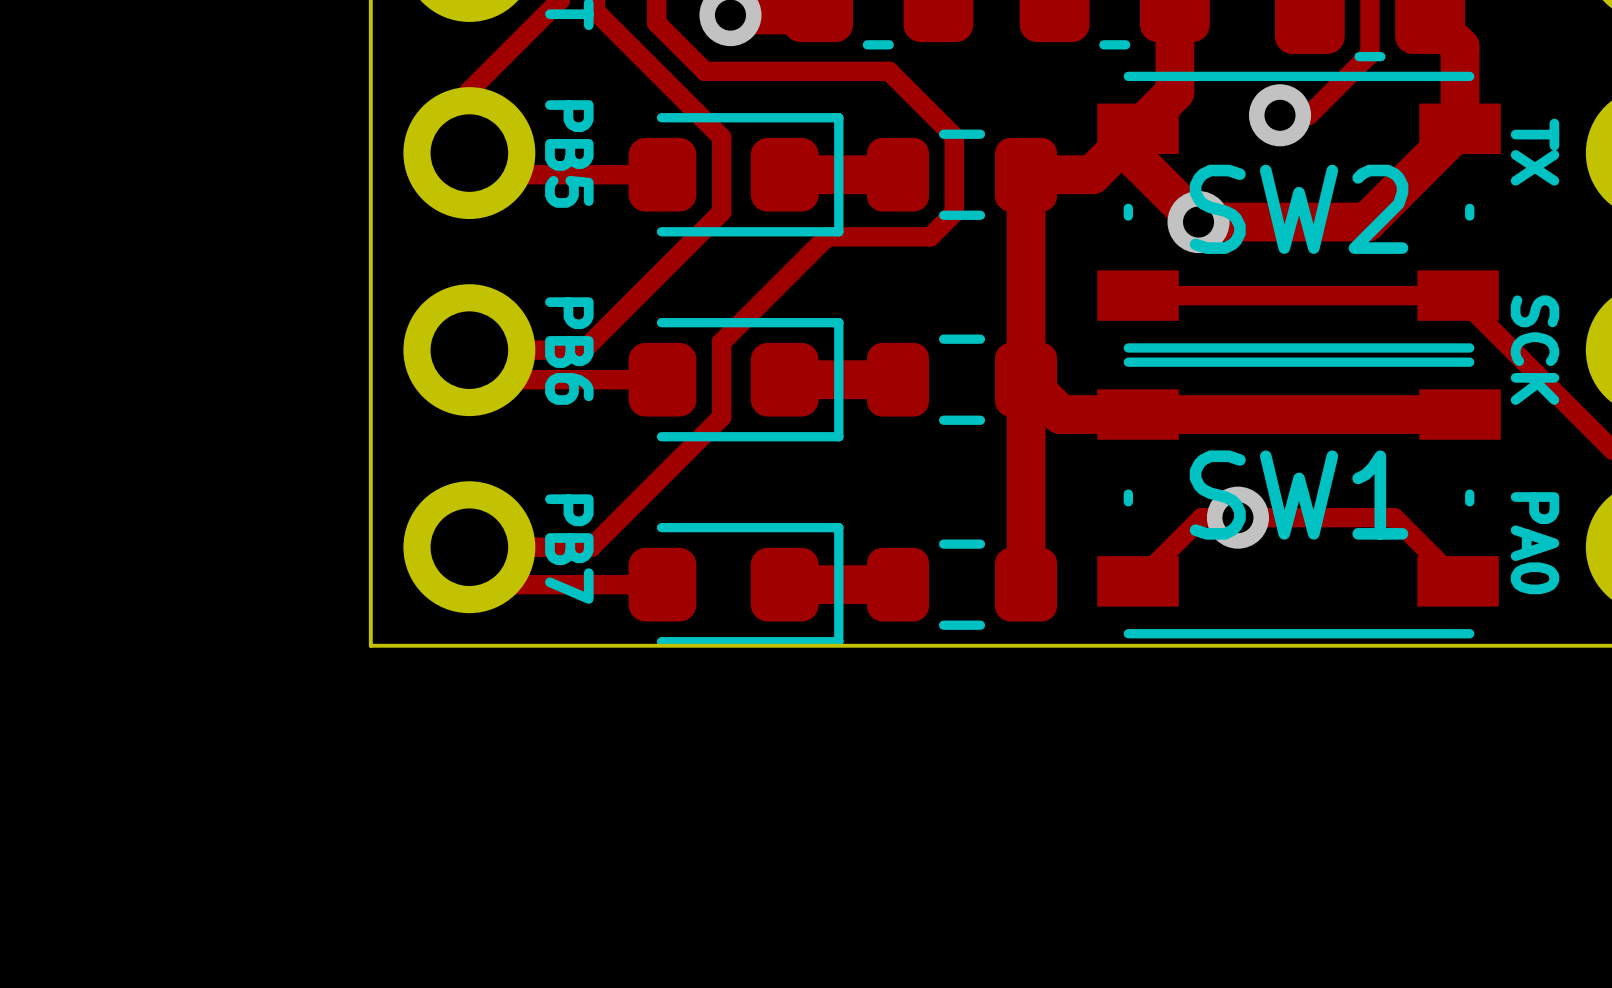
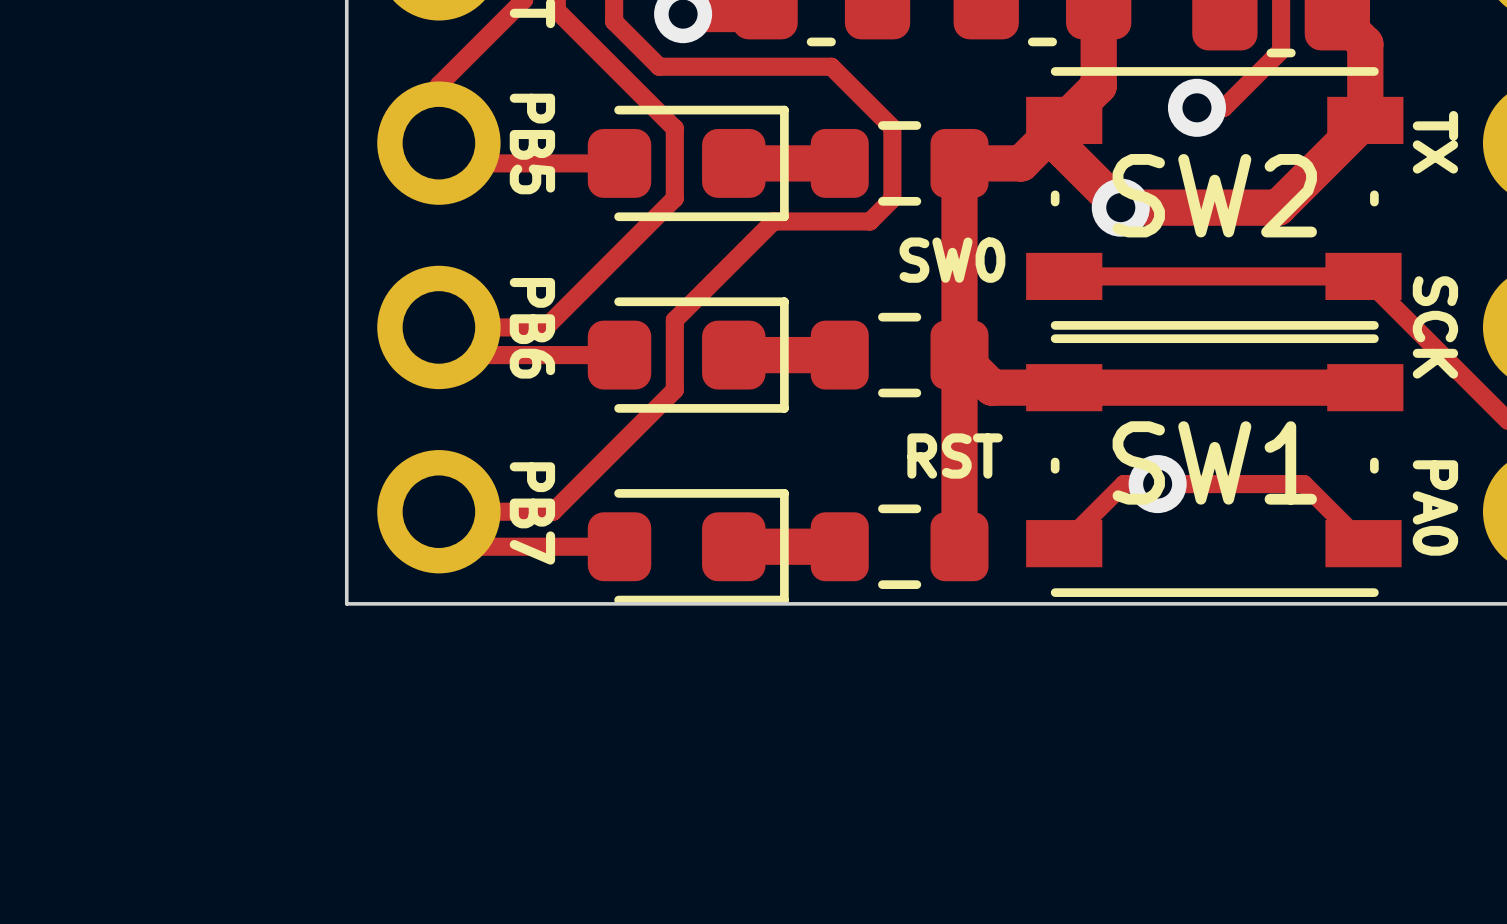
text: none -> SW0 (952, 260)
text: none -> RST (955, 456)

